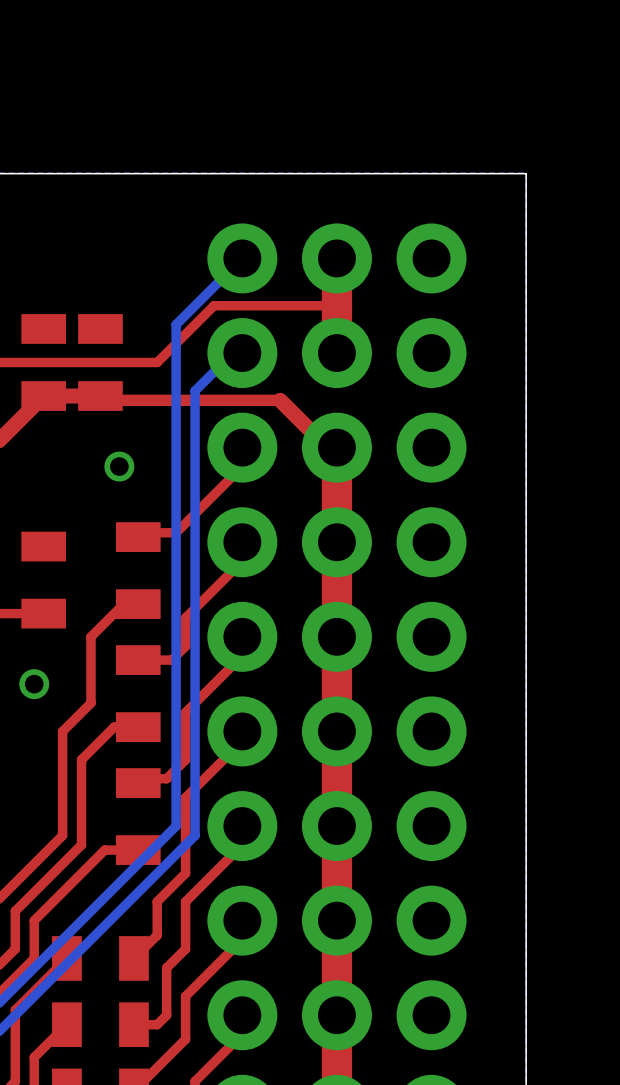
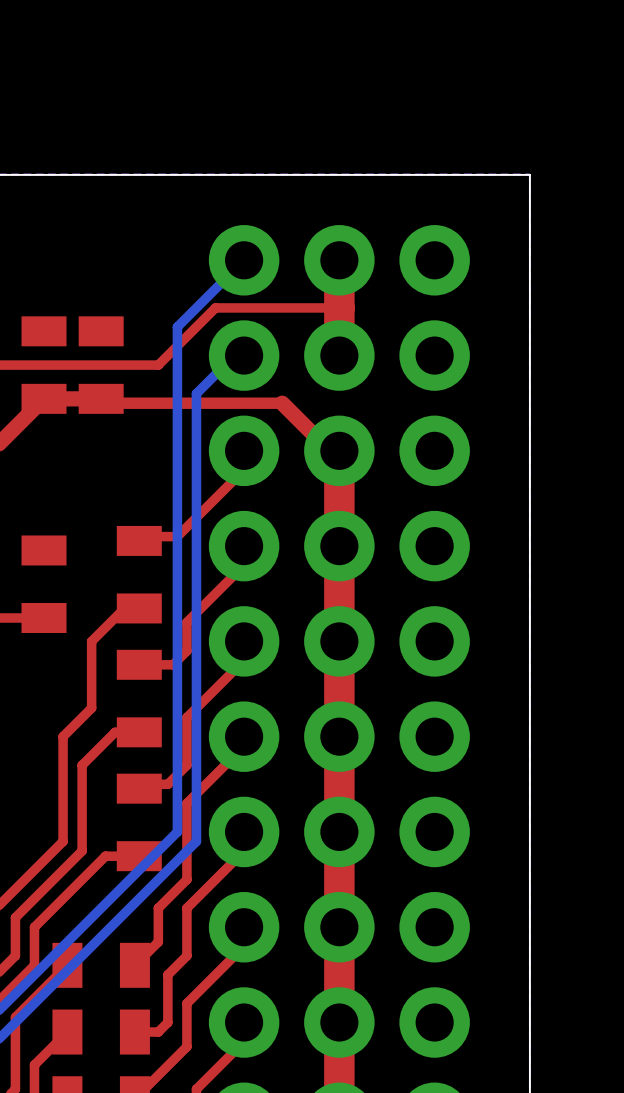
via: (119, 466) -> none
via: (34, 684) -> none

